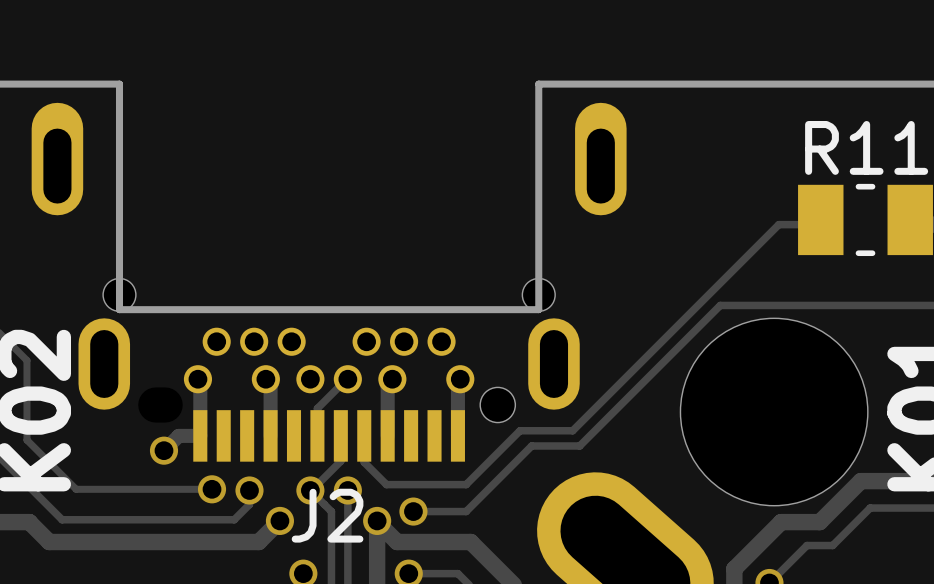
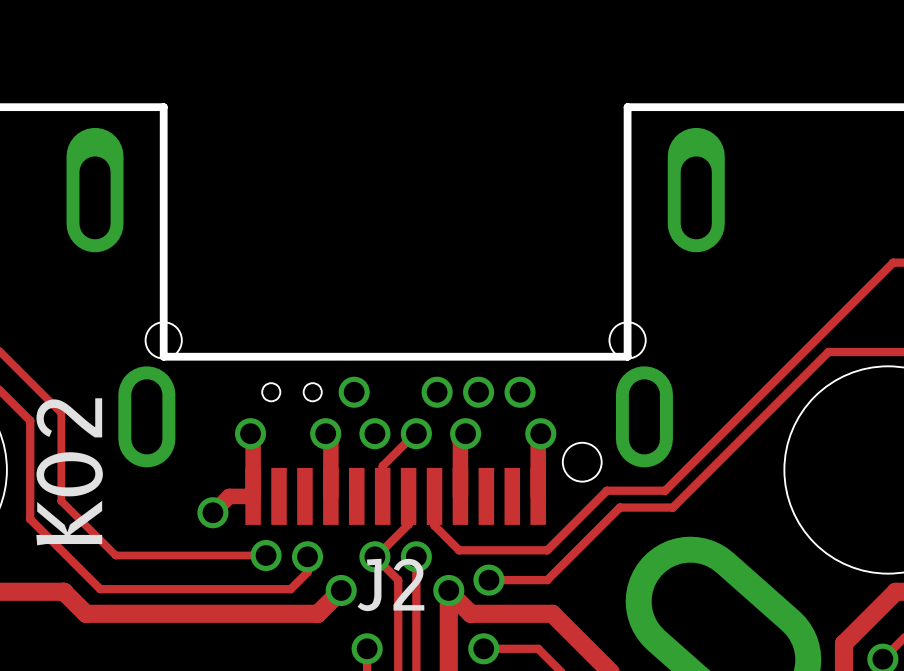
J2 footprint: [31, 102, 627, 462] -> [66, 127, 725, 525]

